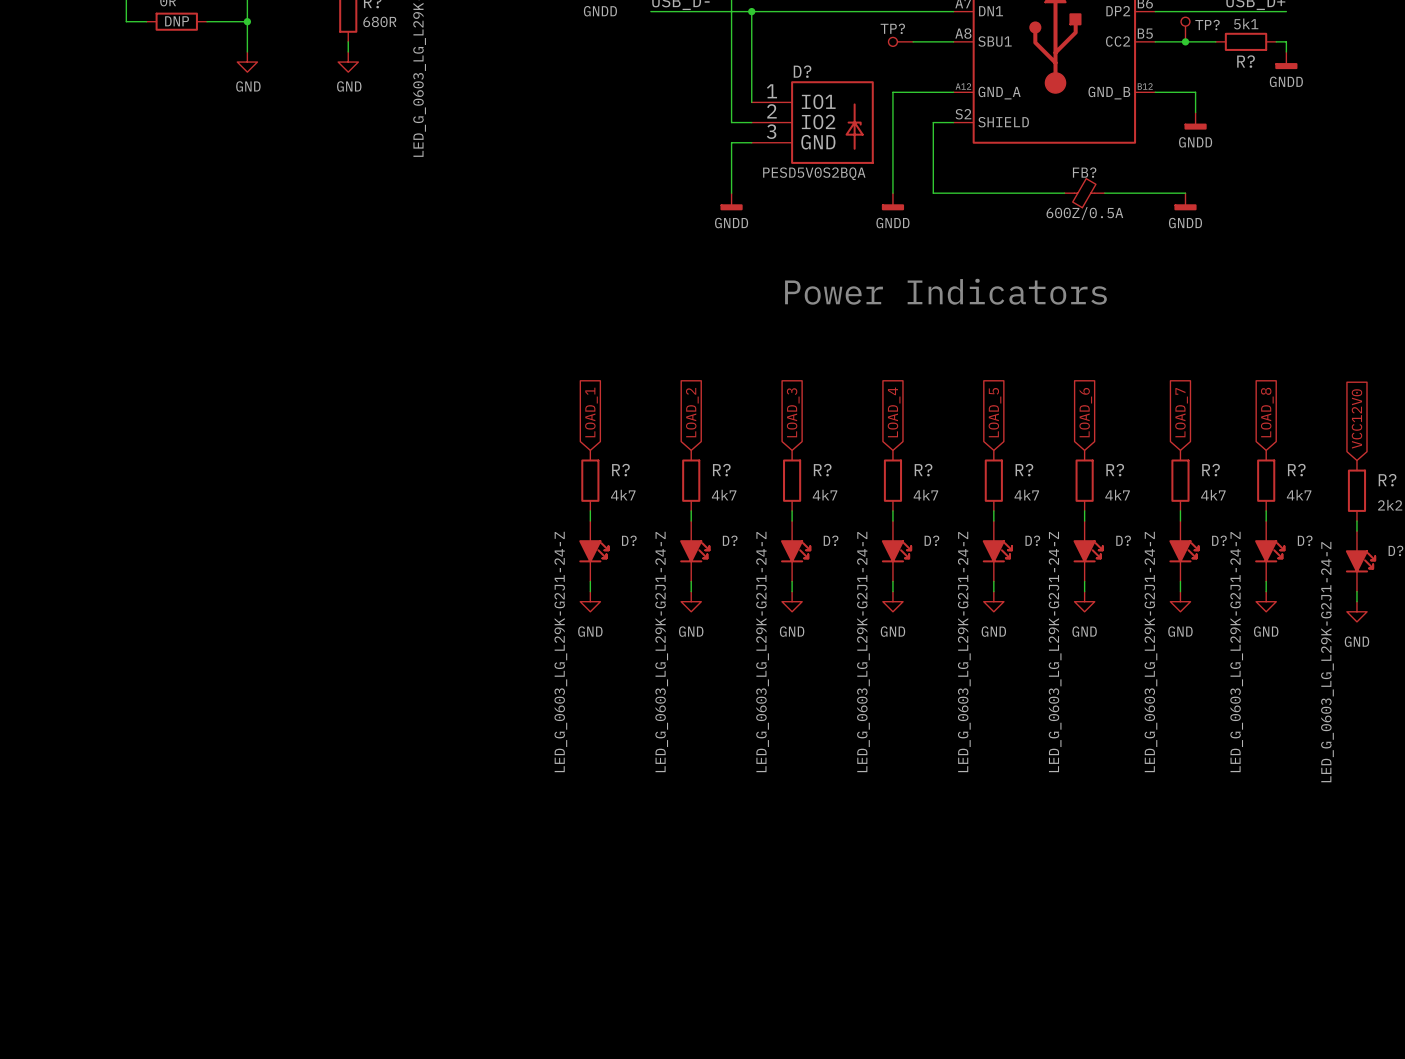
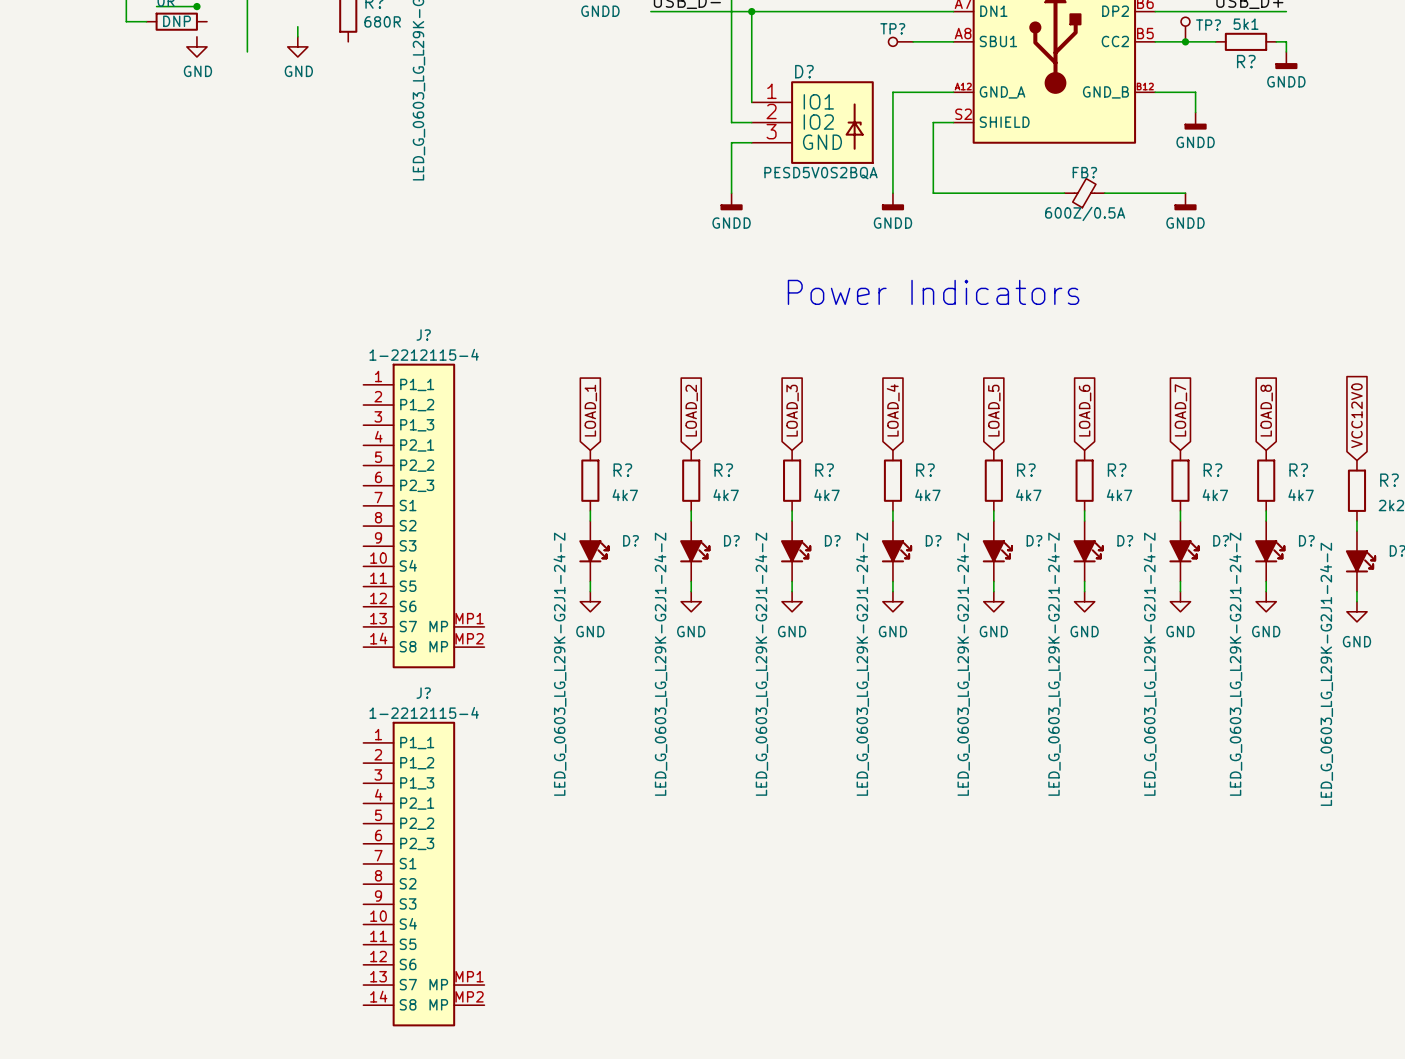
junction: none -> (196, 6)
wire: (207, 21) (247, 21) -> (156, 6) (196, 6)
junction: (247, 21) -> none
wire: (348, 41) (348, 51) -> (297, 26) (297, 36)
power symbol: none -> GND (196, 46)
power symbol: none -> GND (297, 46)
power symbol: GND (247, 62) -> none
power symbol: GND (348, 62) -> none
J?: none -> (423, 515)
J?: none -> (423, 874)

